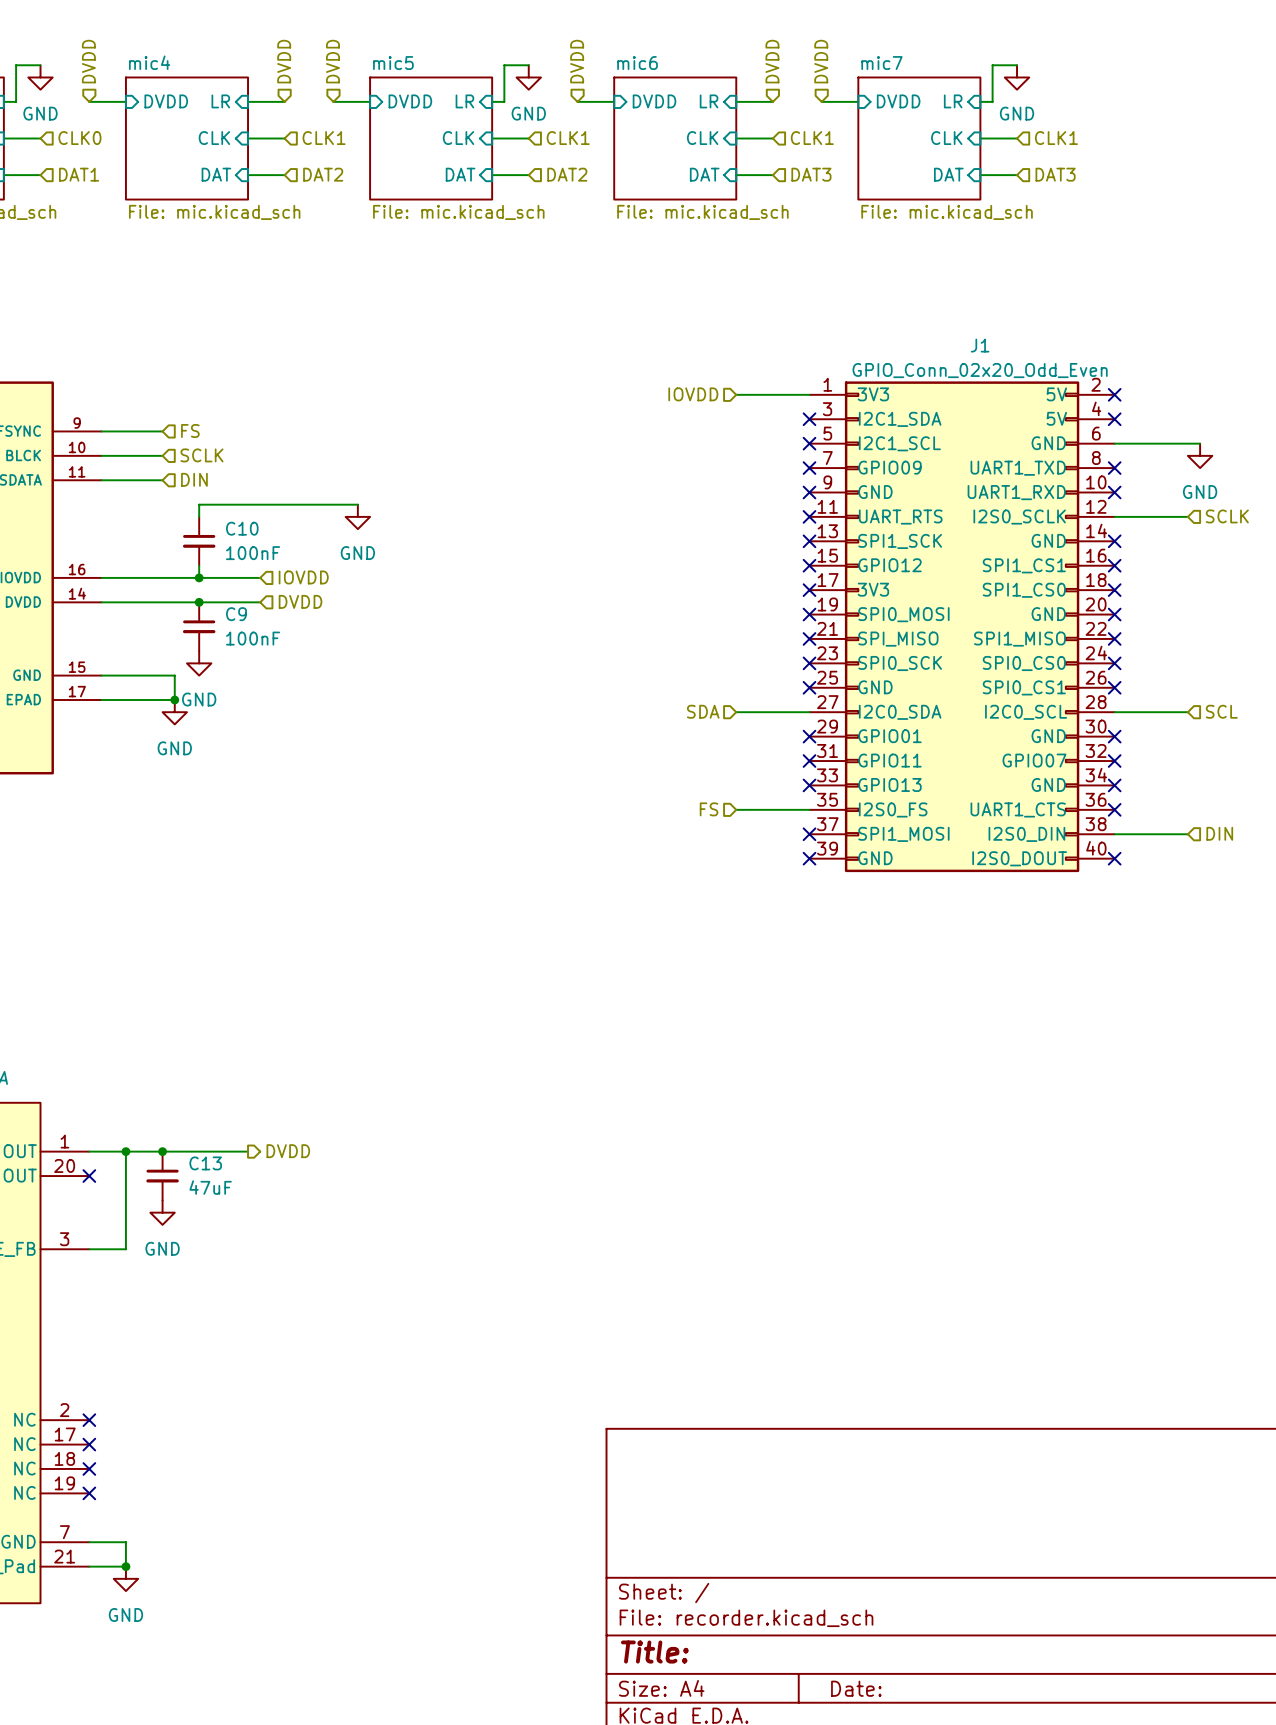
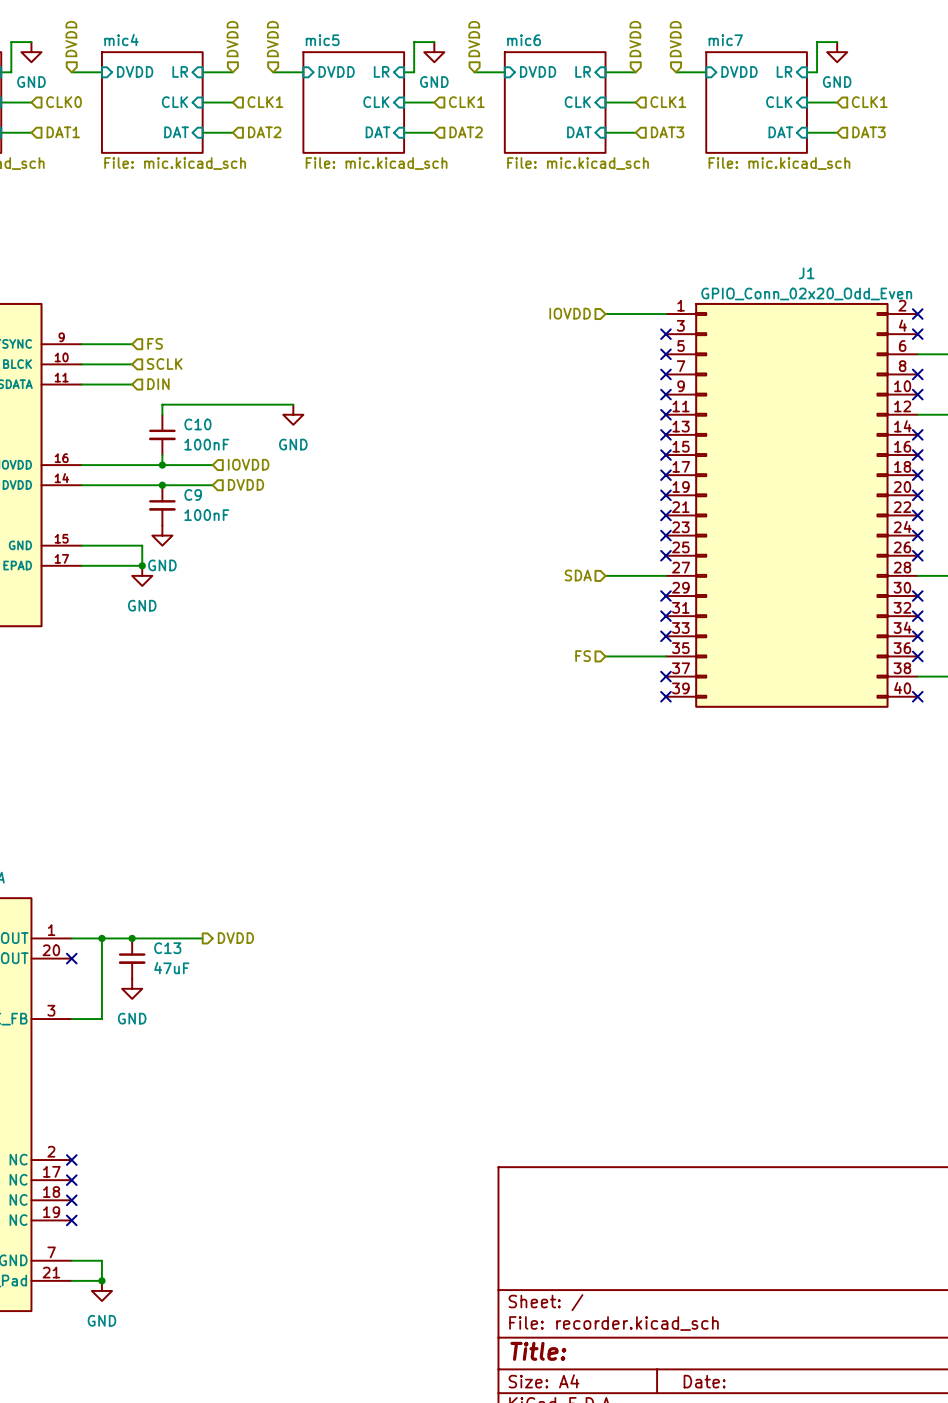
J1 symbol: [809, 381, 1115, 873] -> [665, 302, 918, 708]

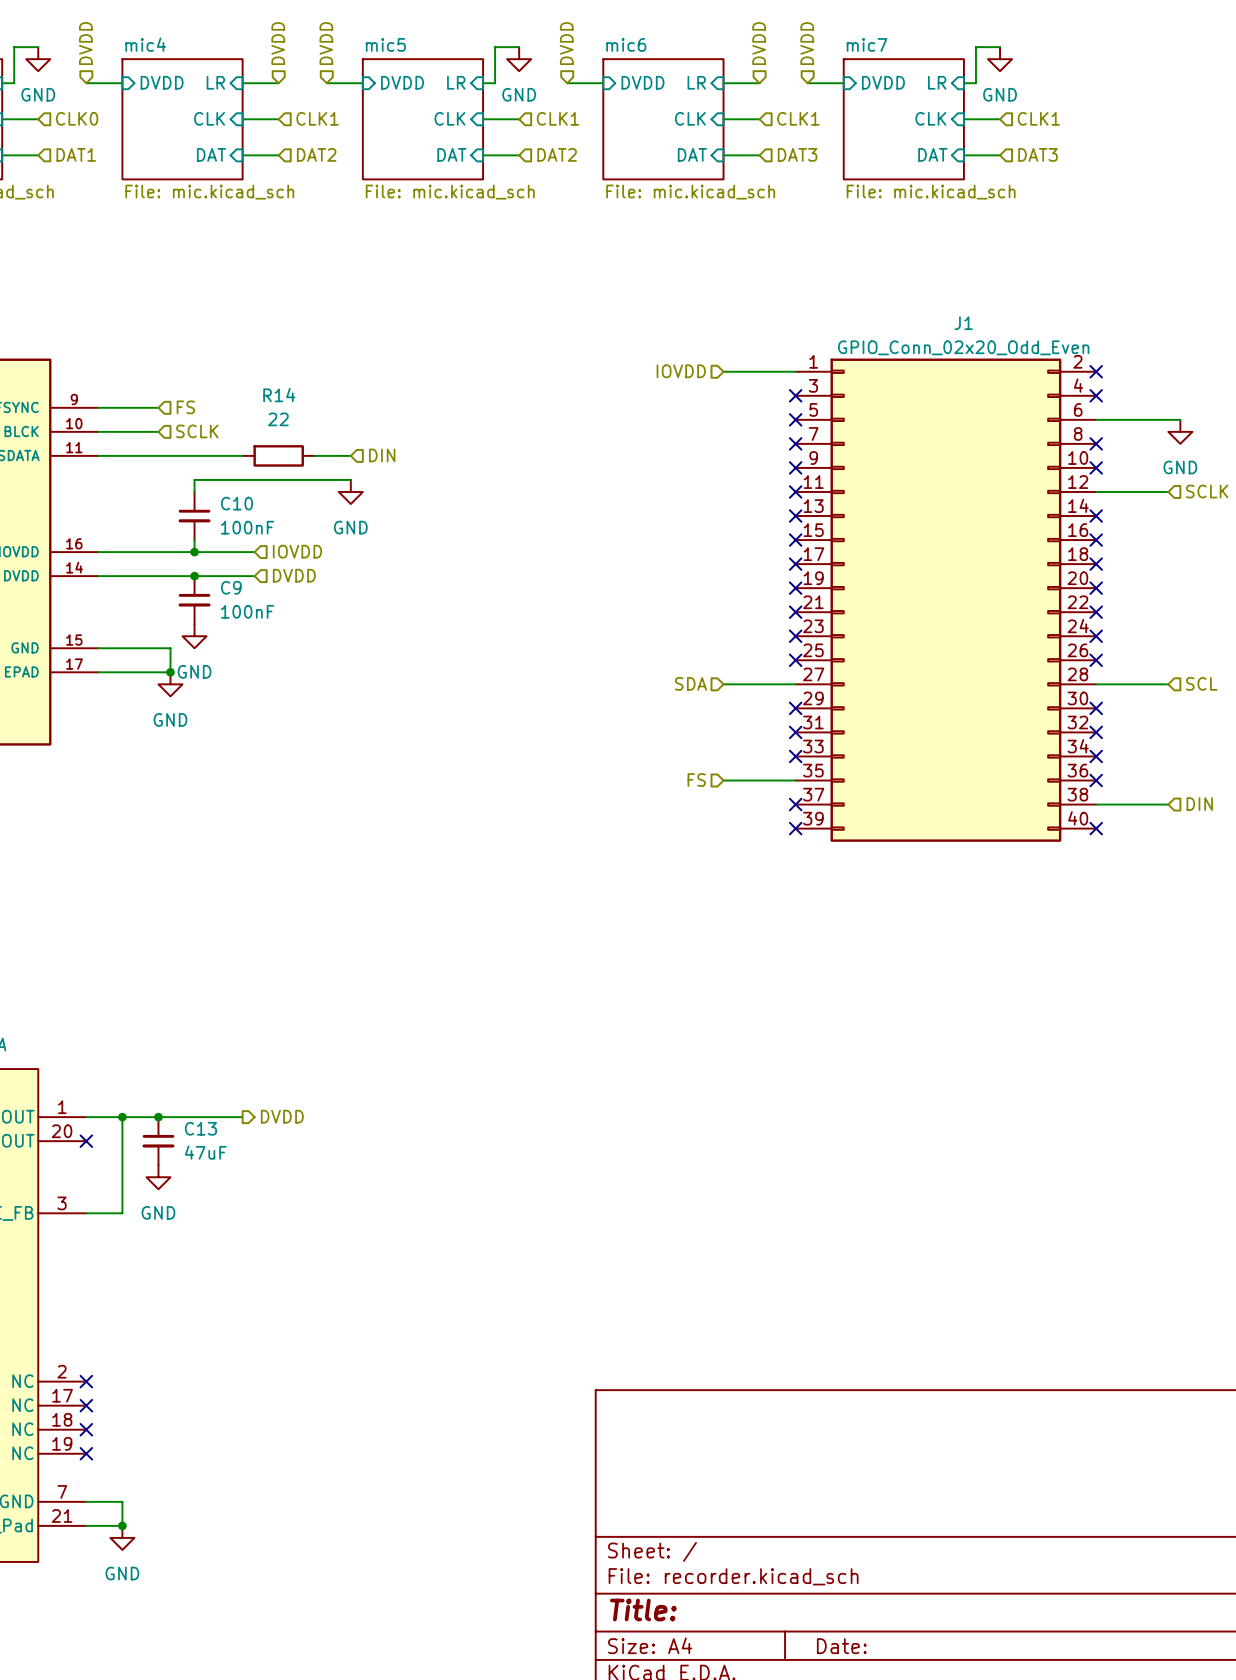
wire: none -> (158, 455) (242, 455)
hierarchical label position: DIN (158, 384) -> DIN (382, 455)
R14: none -> 22 (278, 455)
wire: none -> (314, 455) (350, 455)

